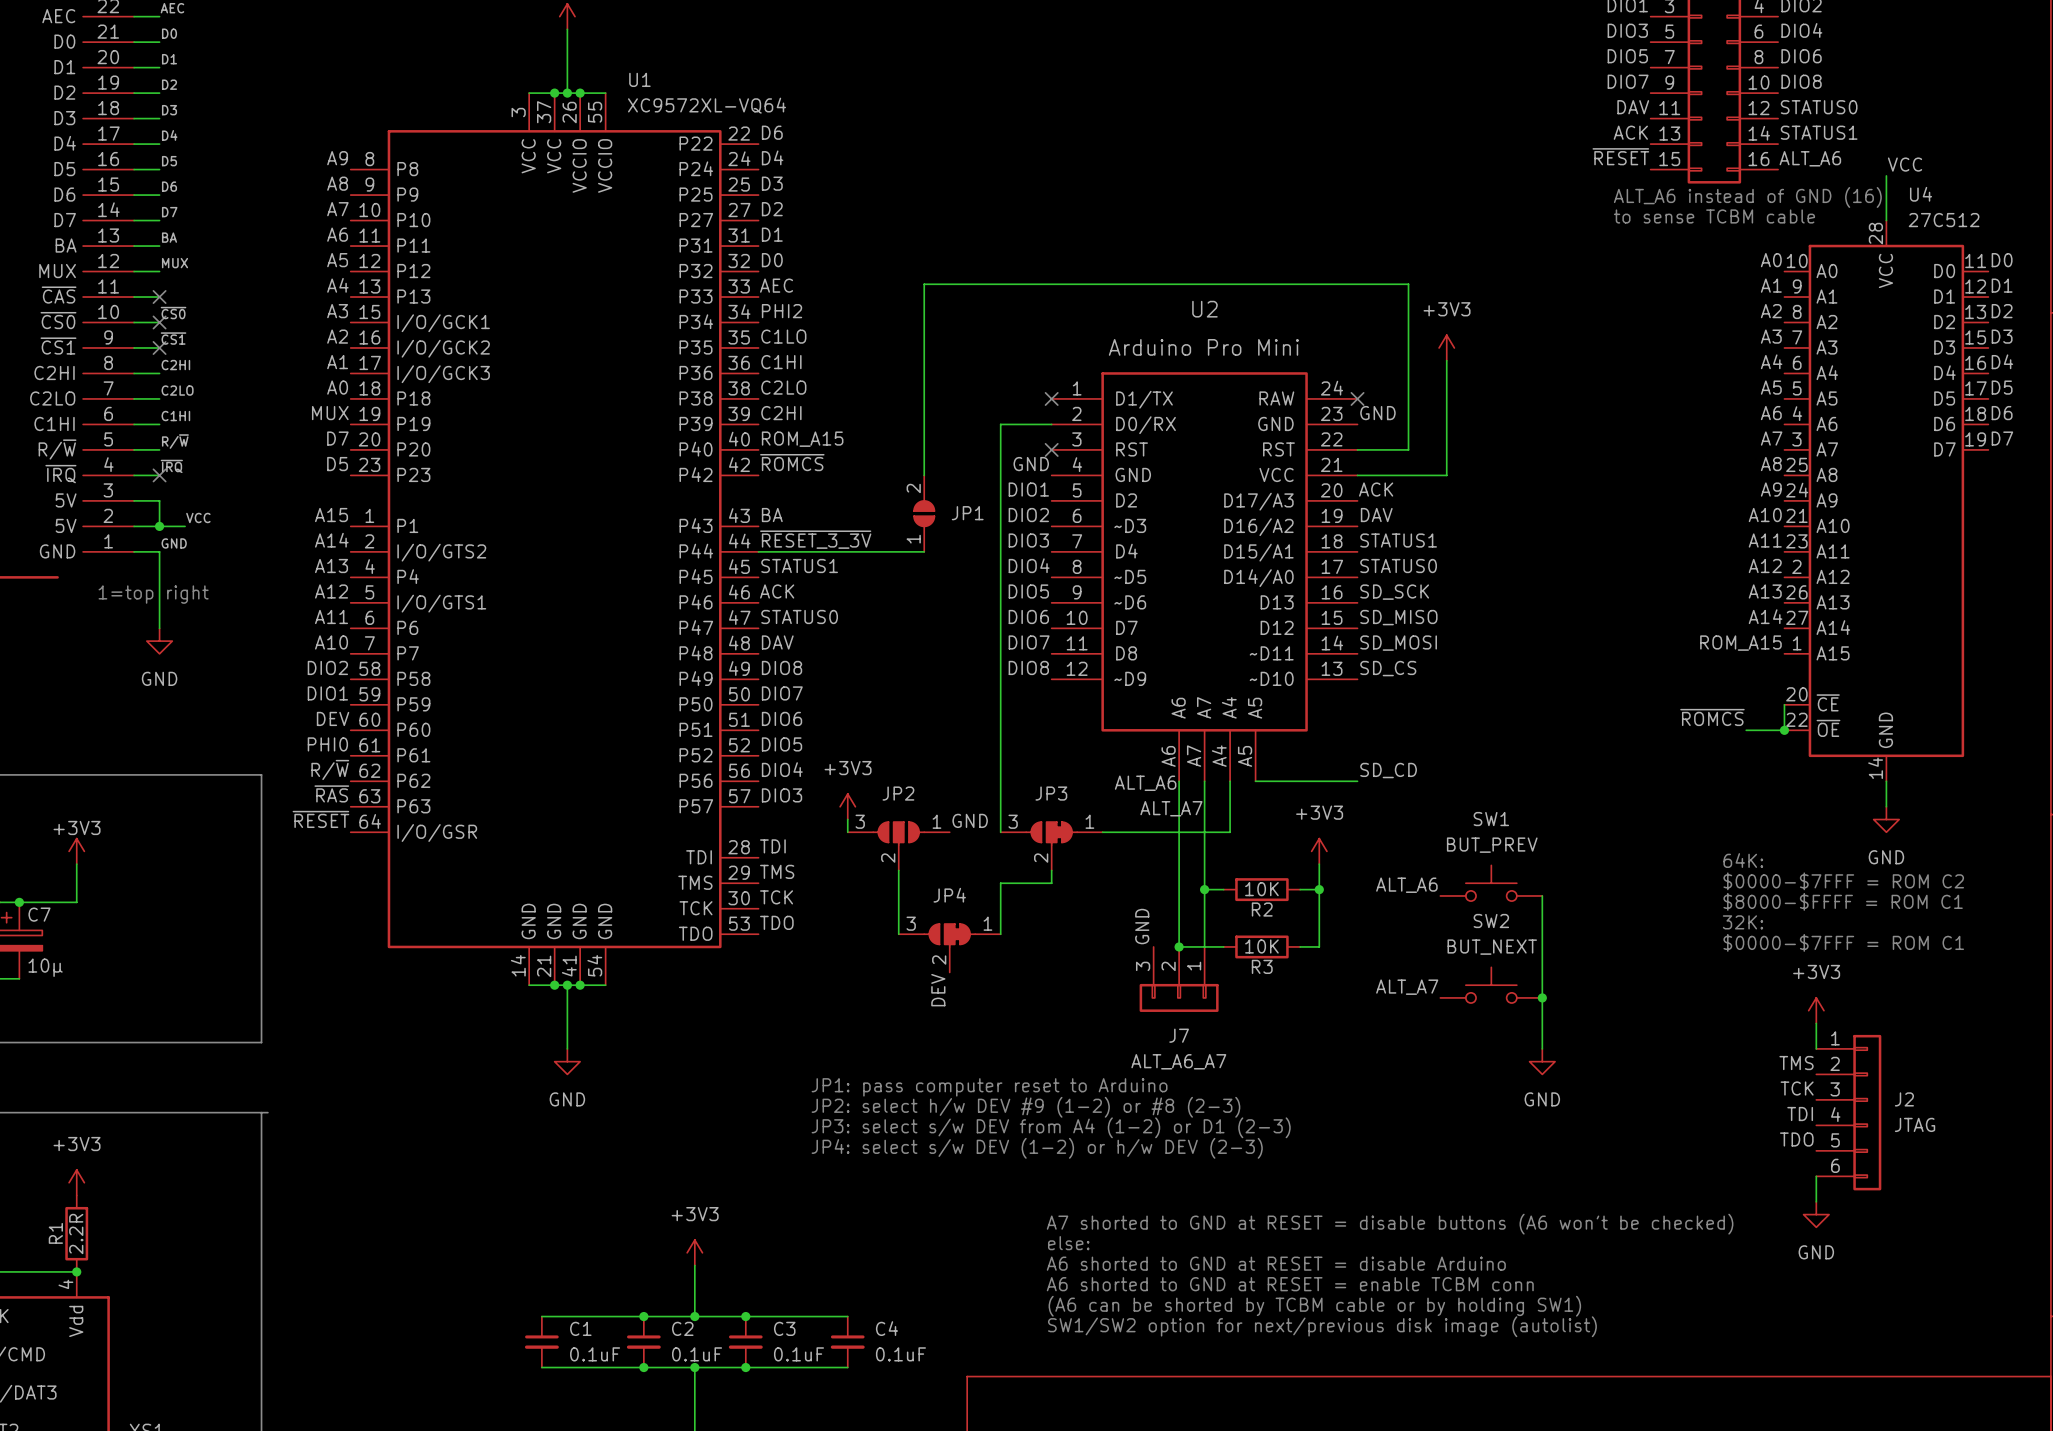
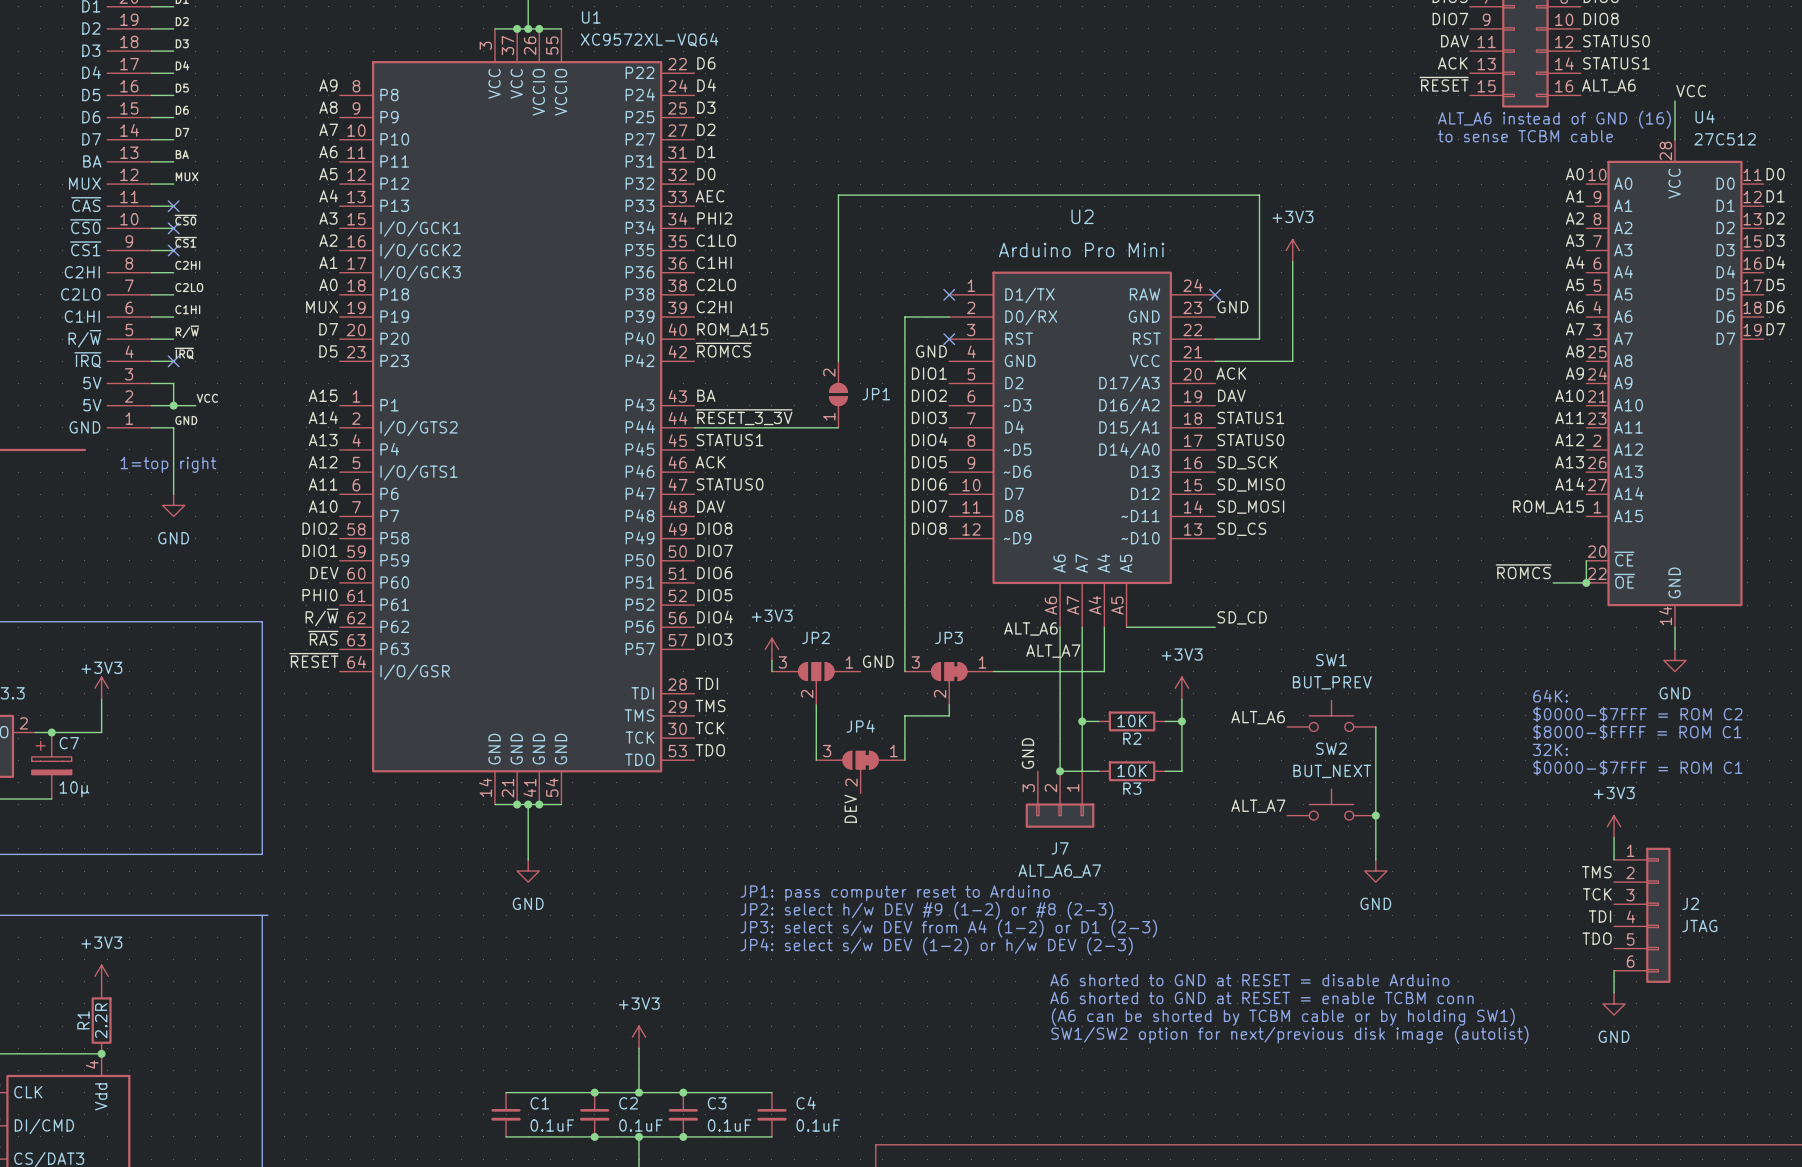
text: A7 shorted to GND at RESET = disable buttons (A6 won't be checked) (1390, 1224) -> none
text: else: (1068, 1243) -> none
text position: A6 shorted to GND at RESET = disable Arduino (1276, 1263) -> A6 shorted to GND at RESET = disable Arduino (1249, 980)
text position: A6 shorted to GND at RESET = enable TCBM conn (1290, 1284) -> A6 shorted to GND at RESET = enable TCBM conn (1261, 998)
text position: (A6 can be shorted by TCBM cable or by holding SW1) (1314, 1306) -> (A6 can be shorted by TCBM cable or by holding SW1) (1283, 1017)
text position: SW1/SW2 option for next/previous disk image (autolist) (1322, 1326) -> SW1/SW2 option for next/previous disk image (autolist) (1289, 1034)

